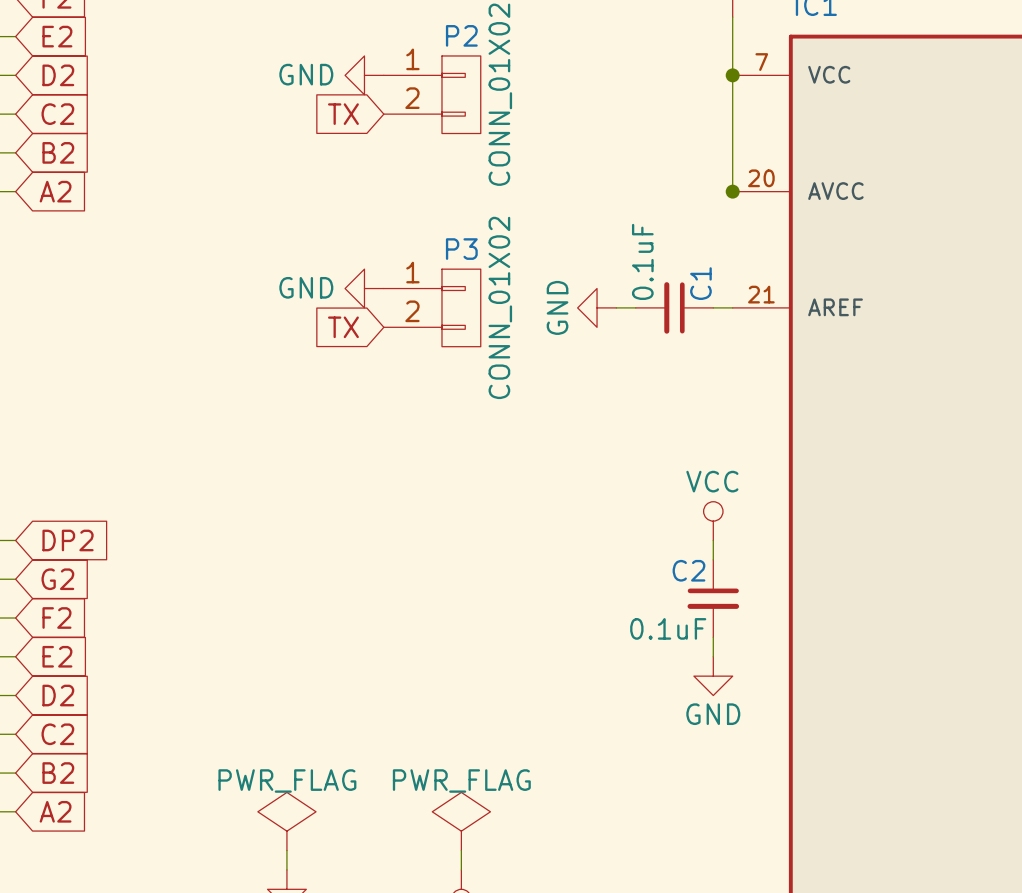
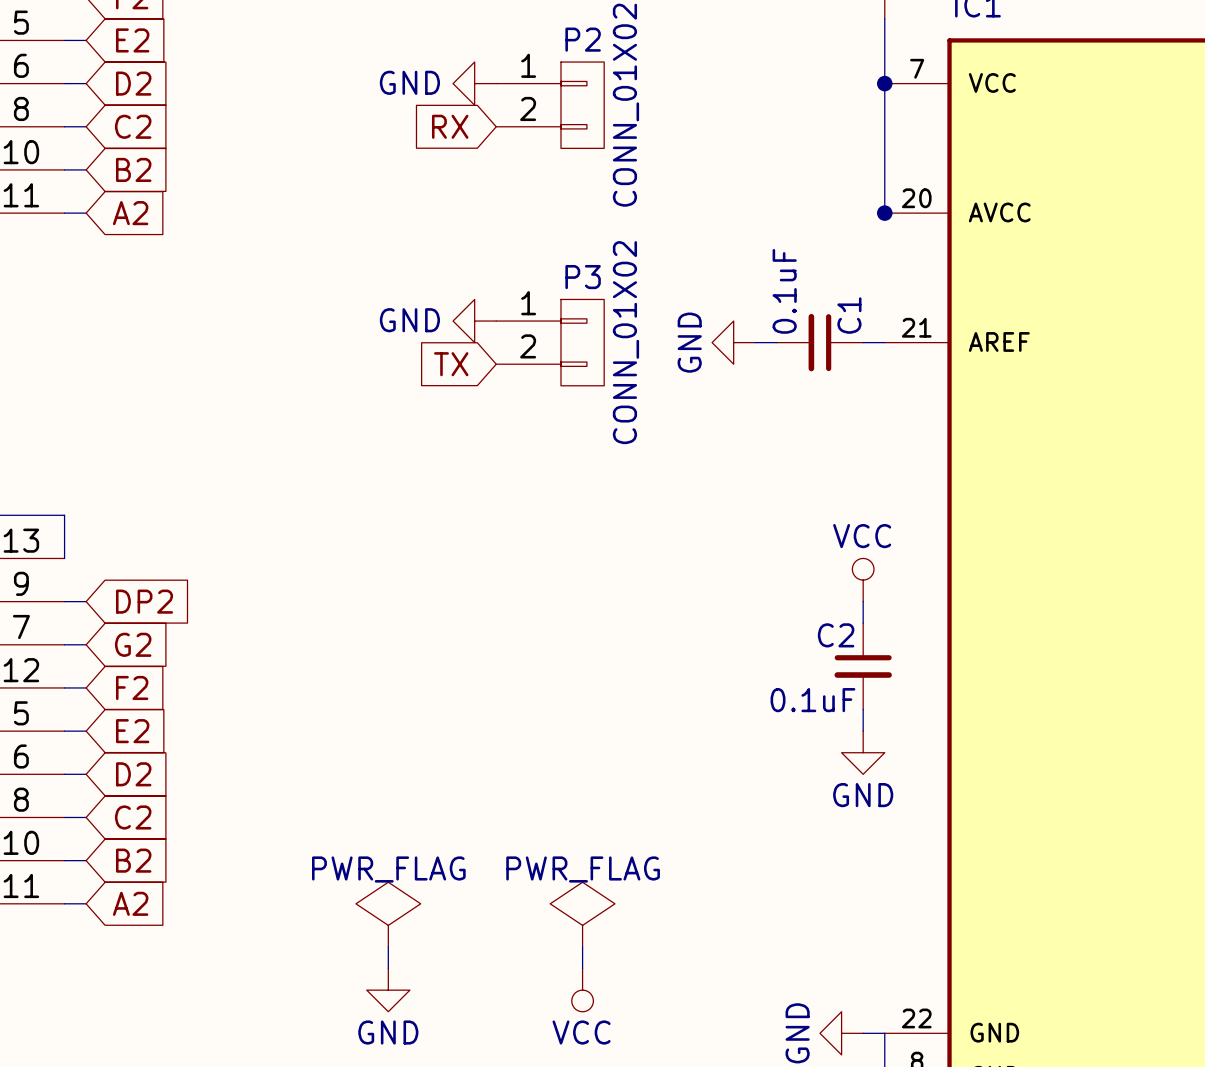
global label: TX (343, 114) -> RX (450, 126)

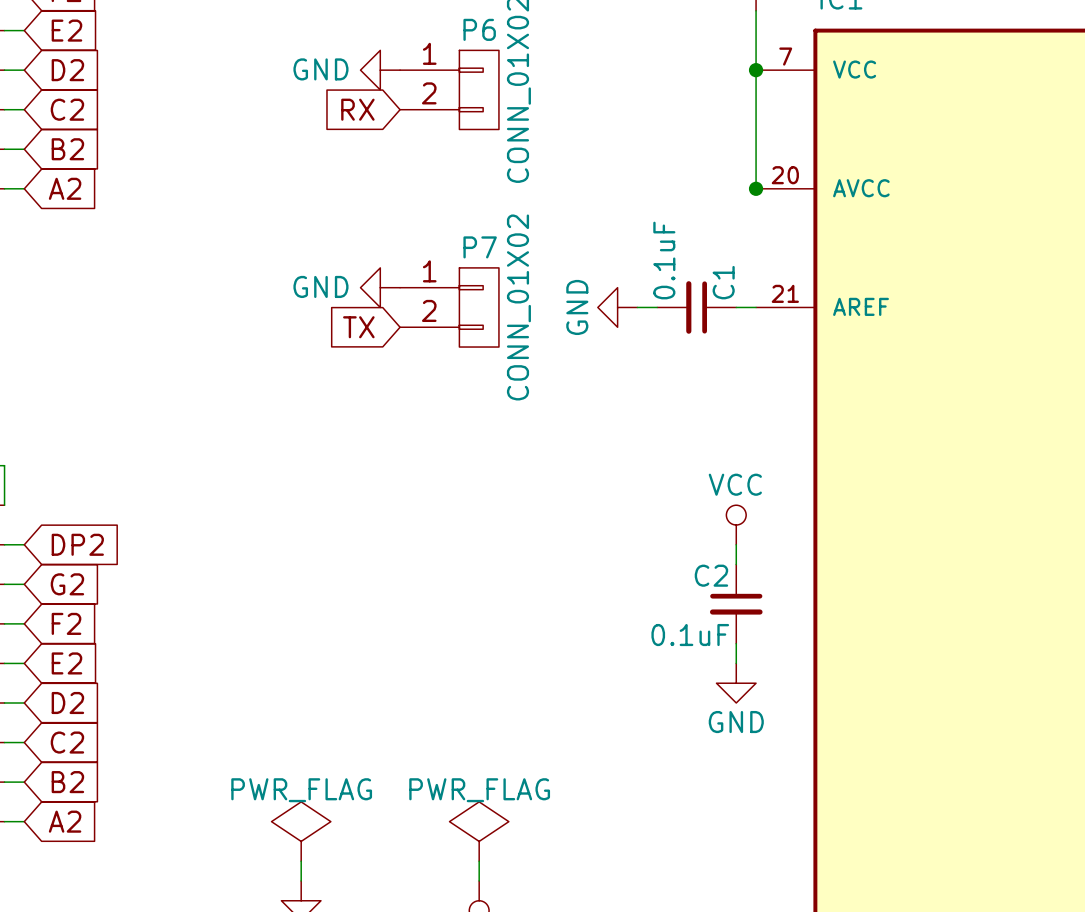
P2 name: P2 (583, 39) -> P6 (479, 29)
P3 name: P3 (583, 277) -> P7 (480, 247)

